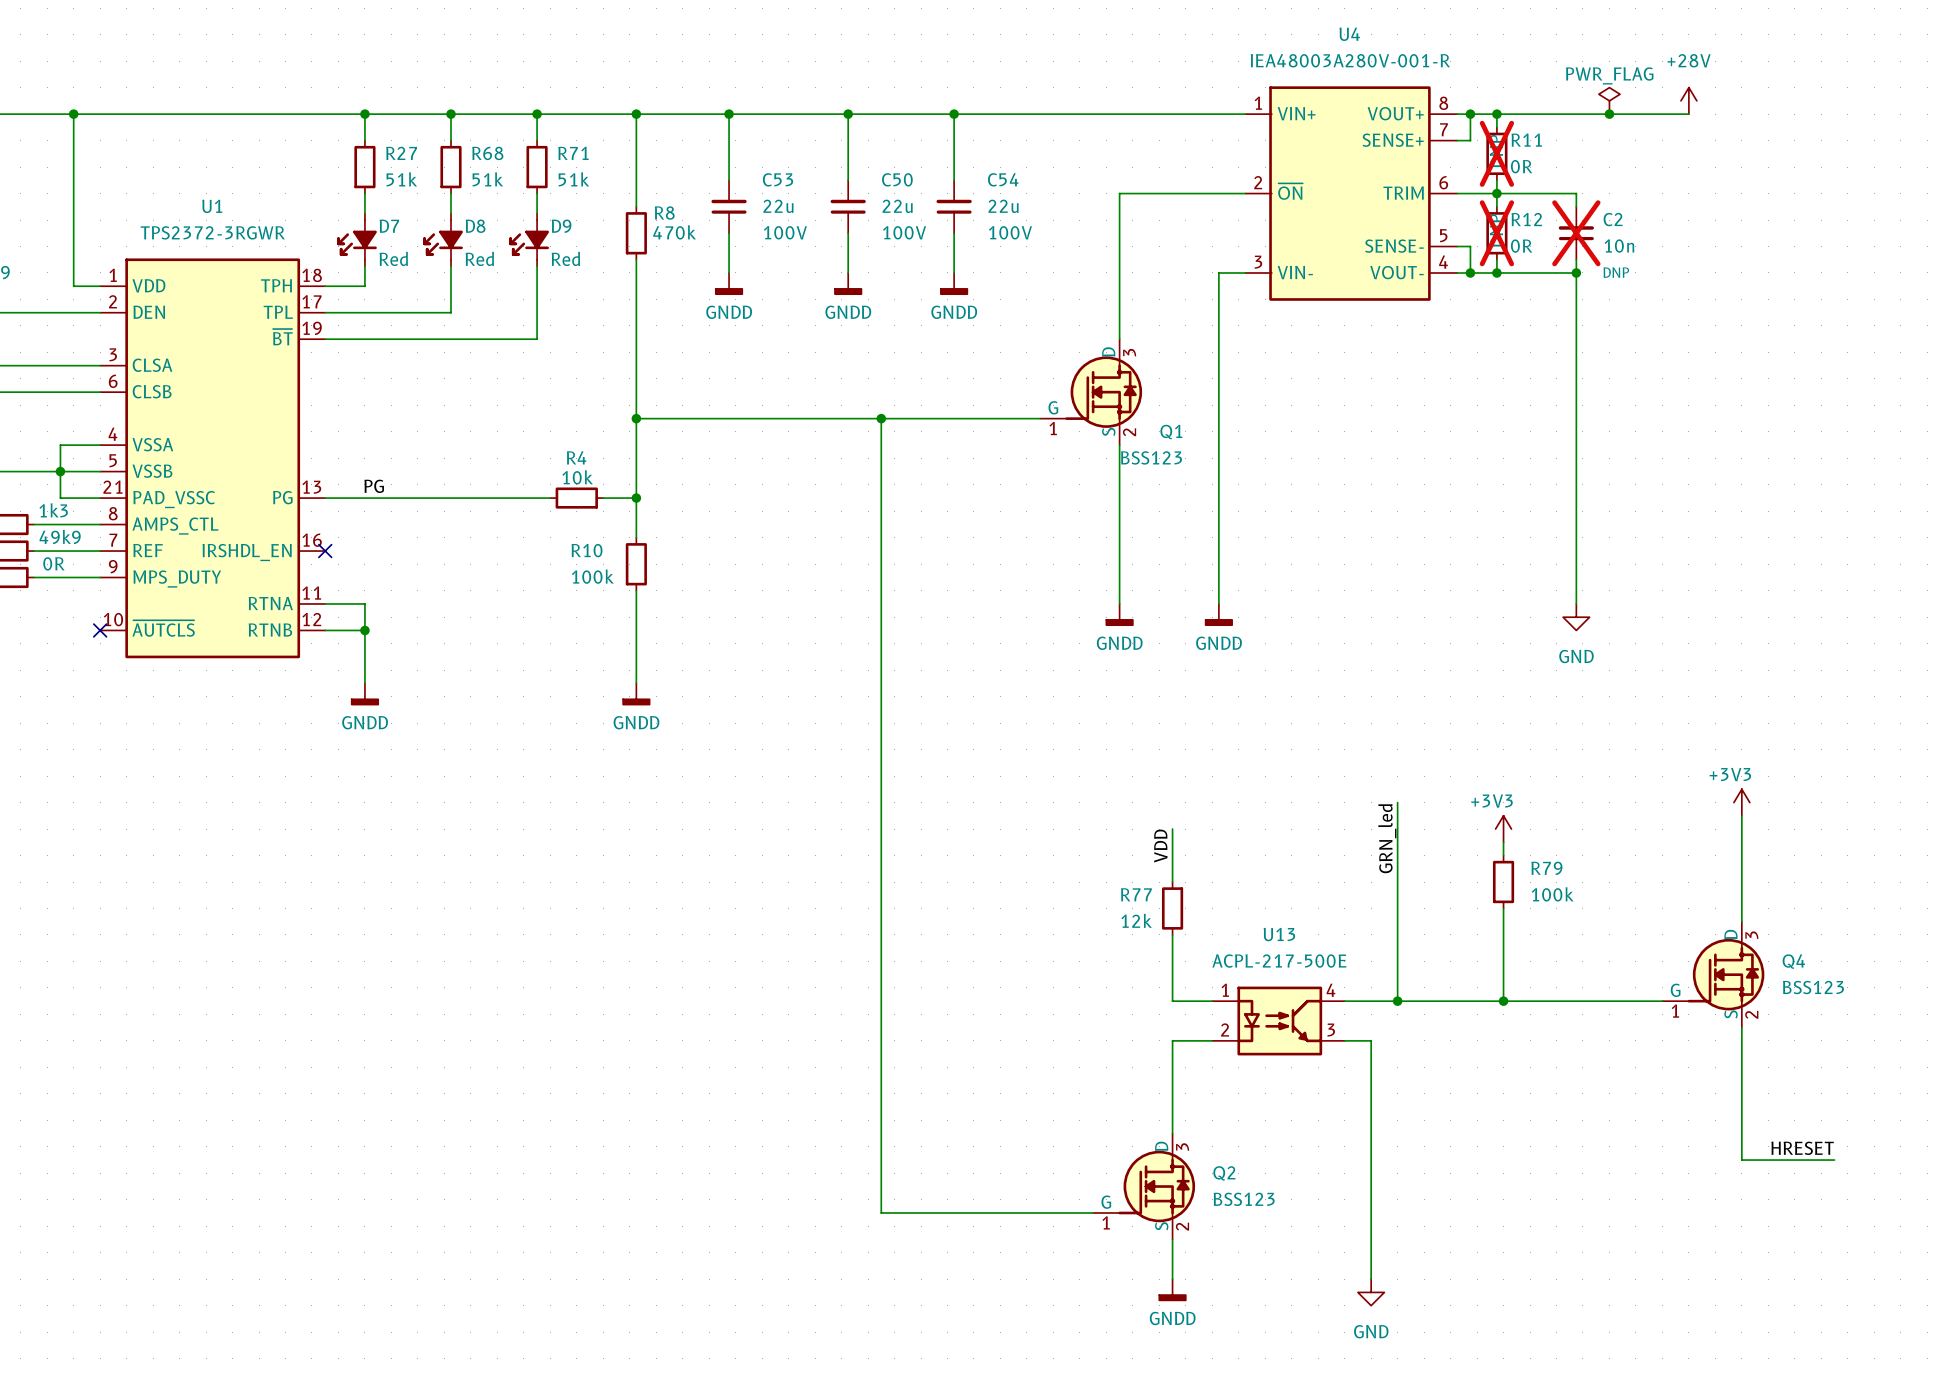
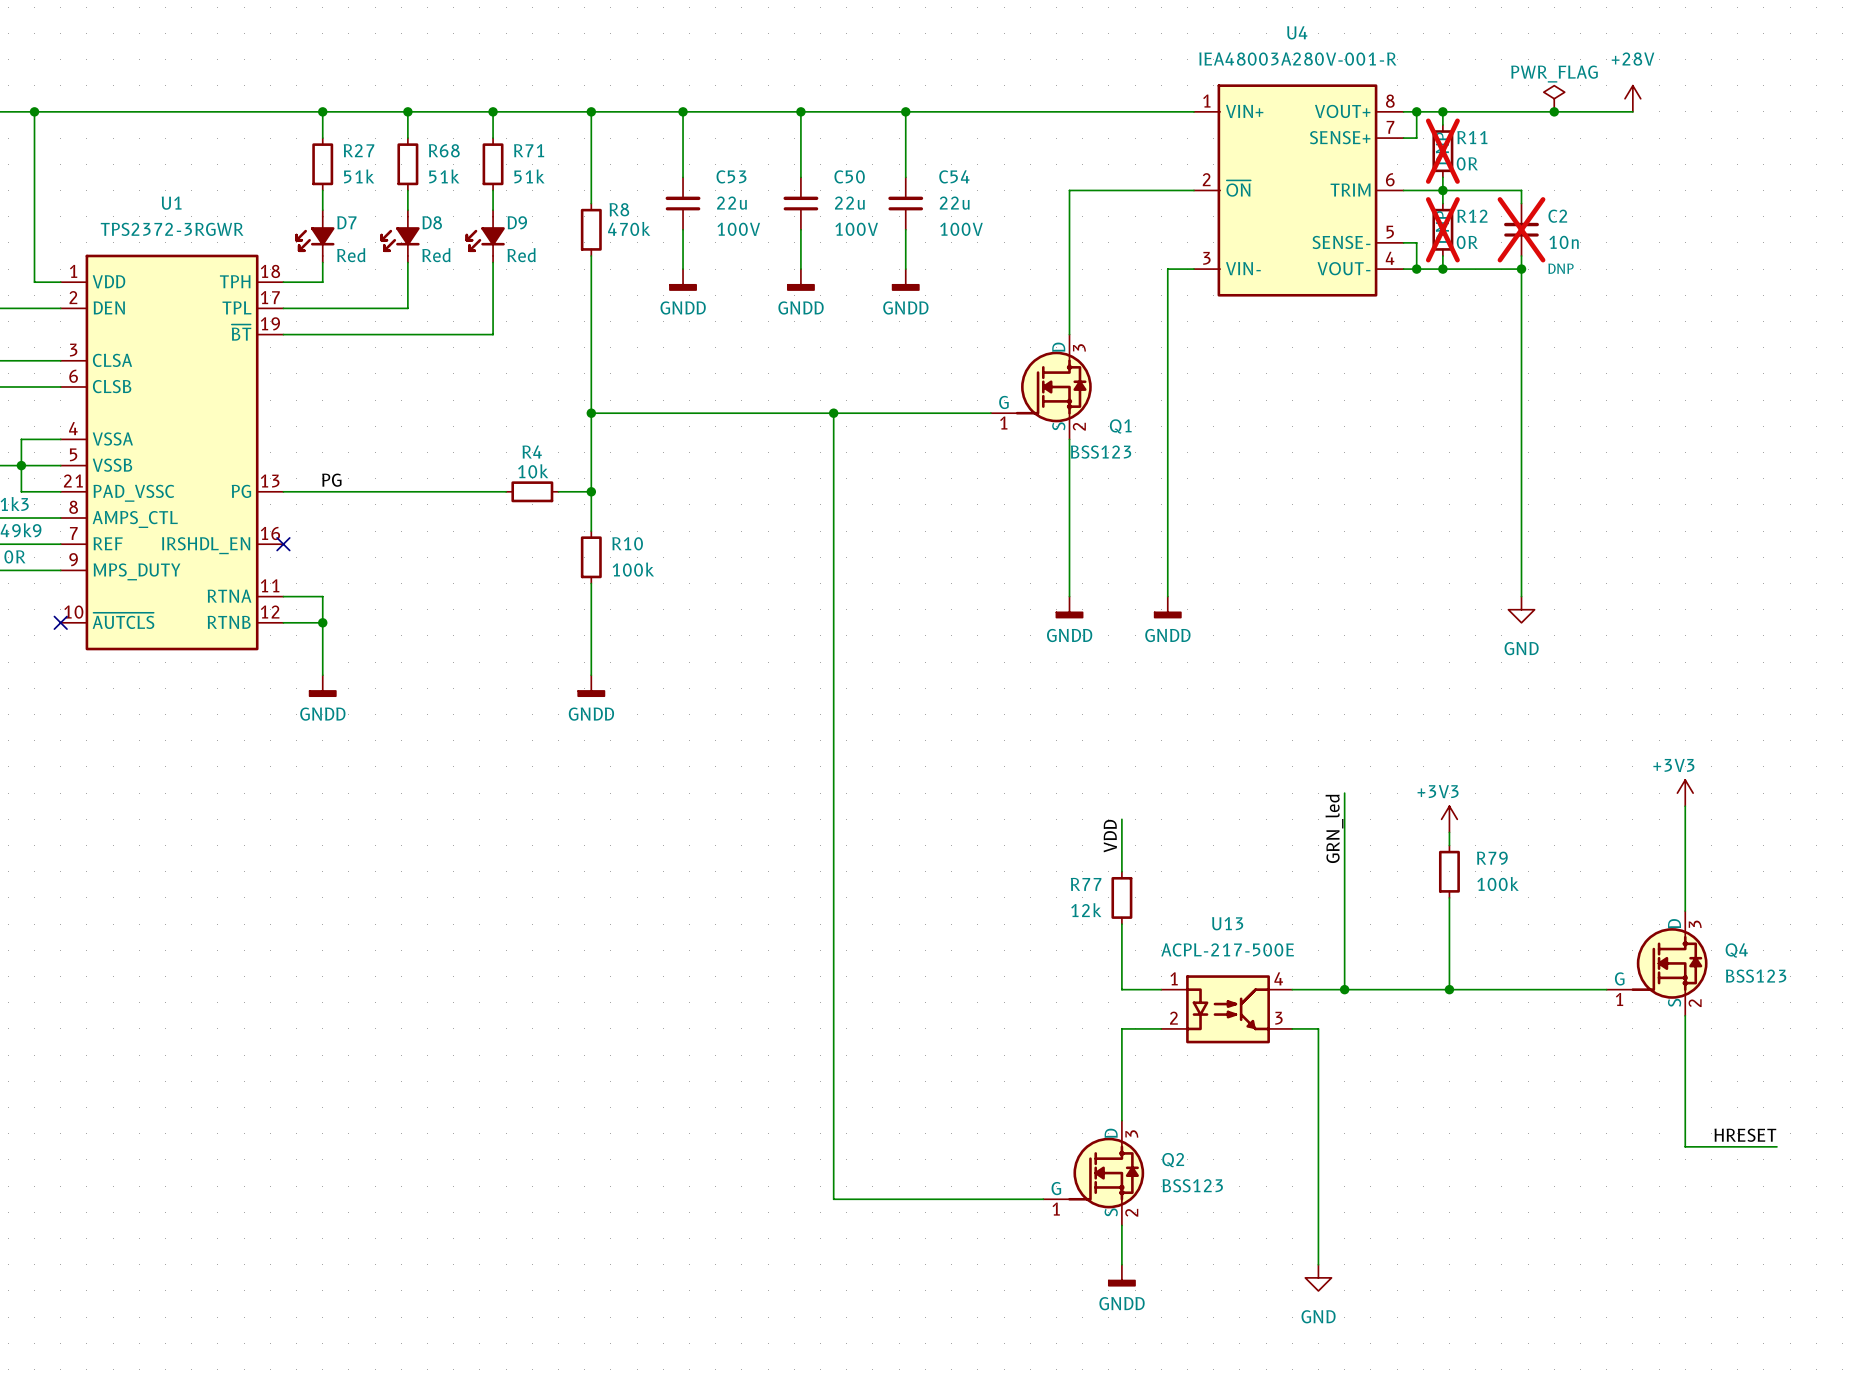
R10 name position: R10 (586, 550) -> R10 (627, 543)
R10 text position: 100k (592, 576) -> 100k (633, 569)

